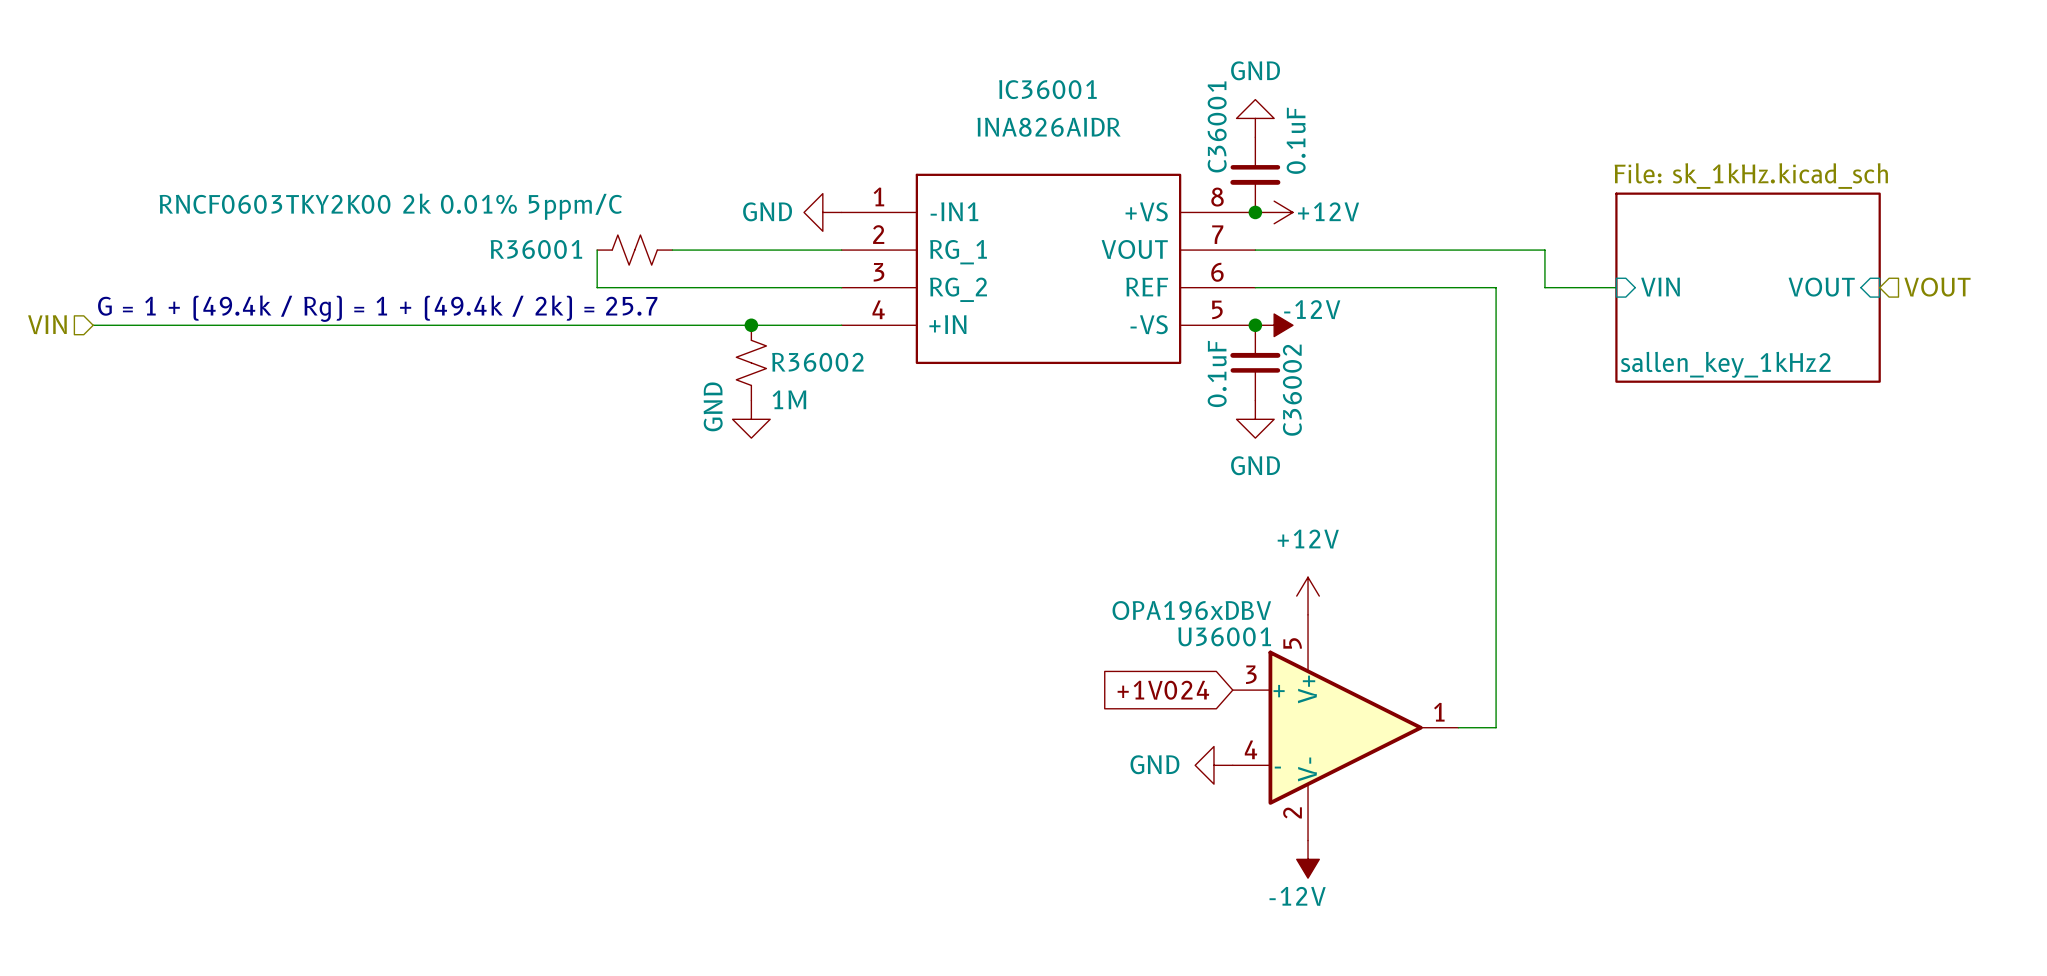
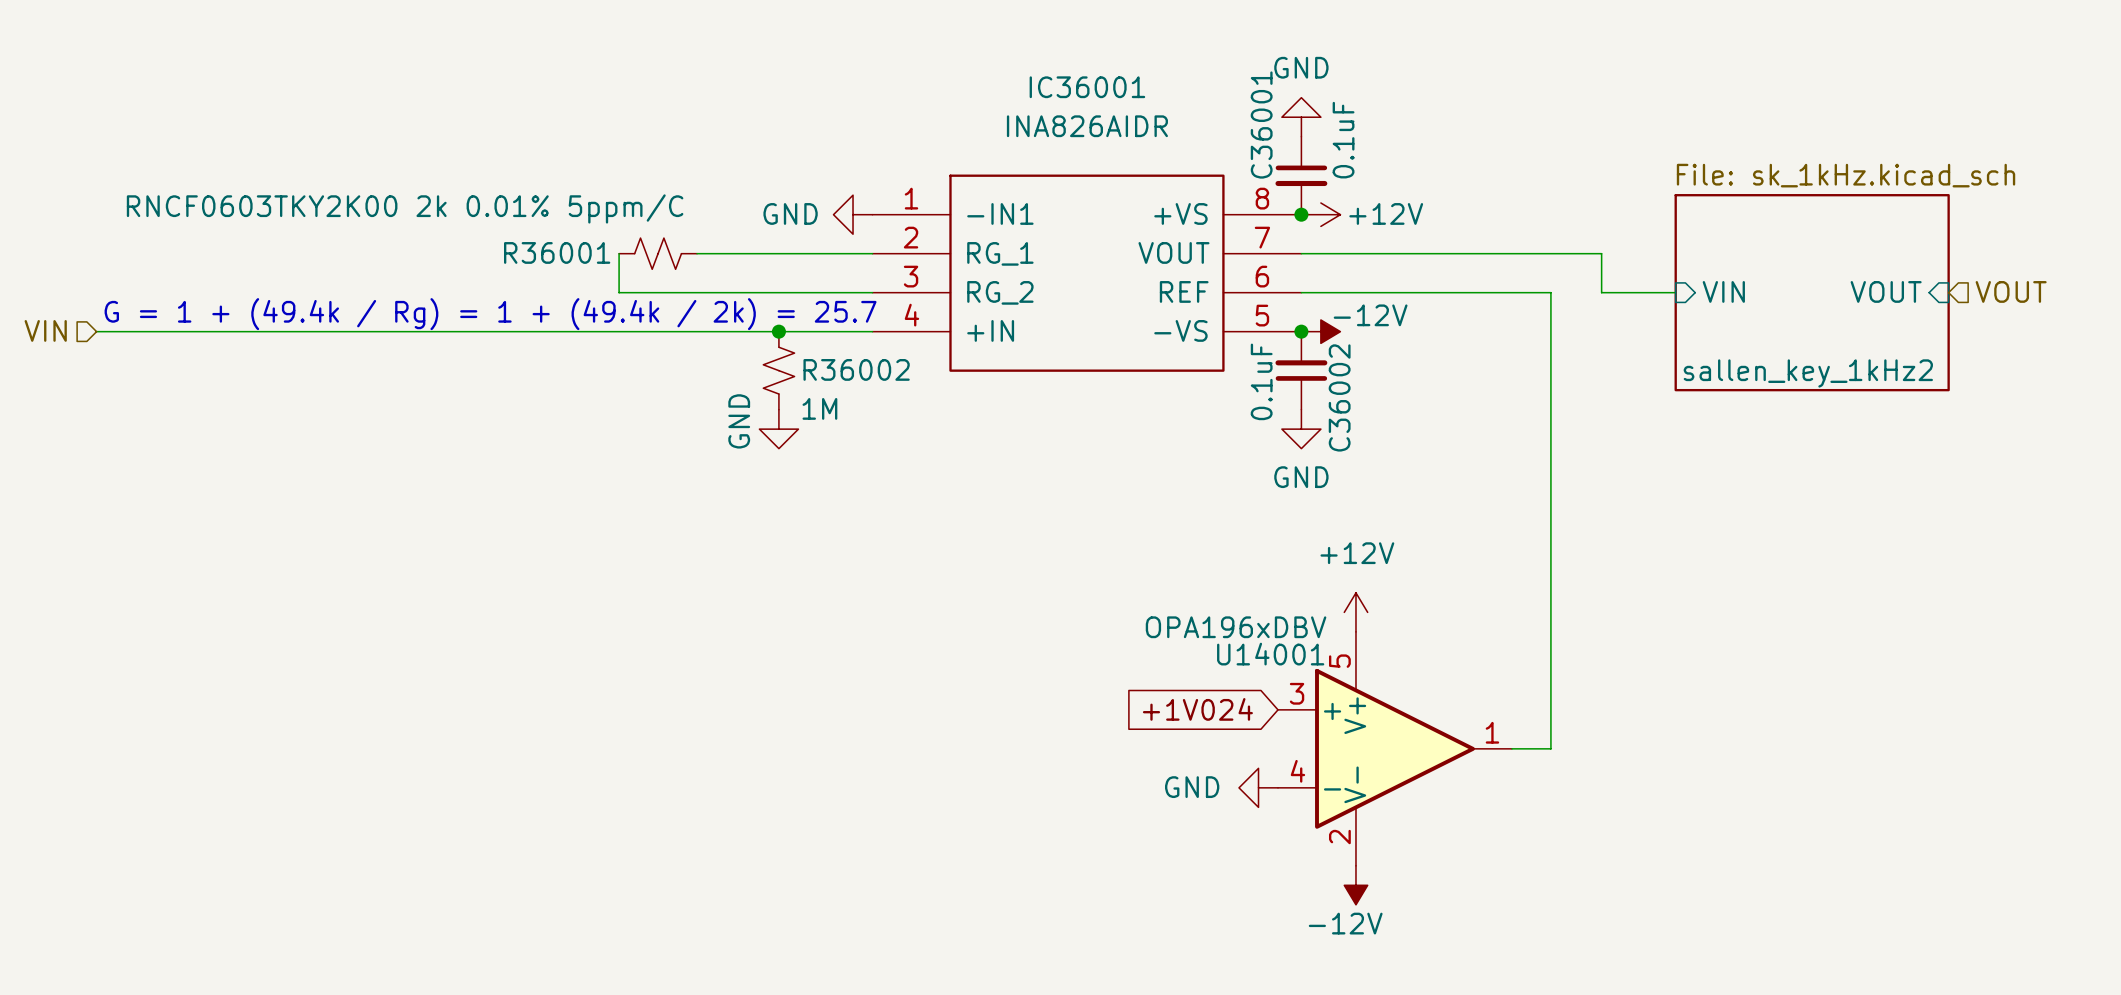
U36001 name: U36001 (1224, 636) -> U14001 (1270, 654)

